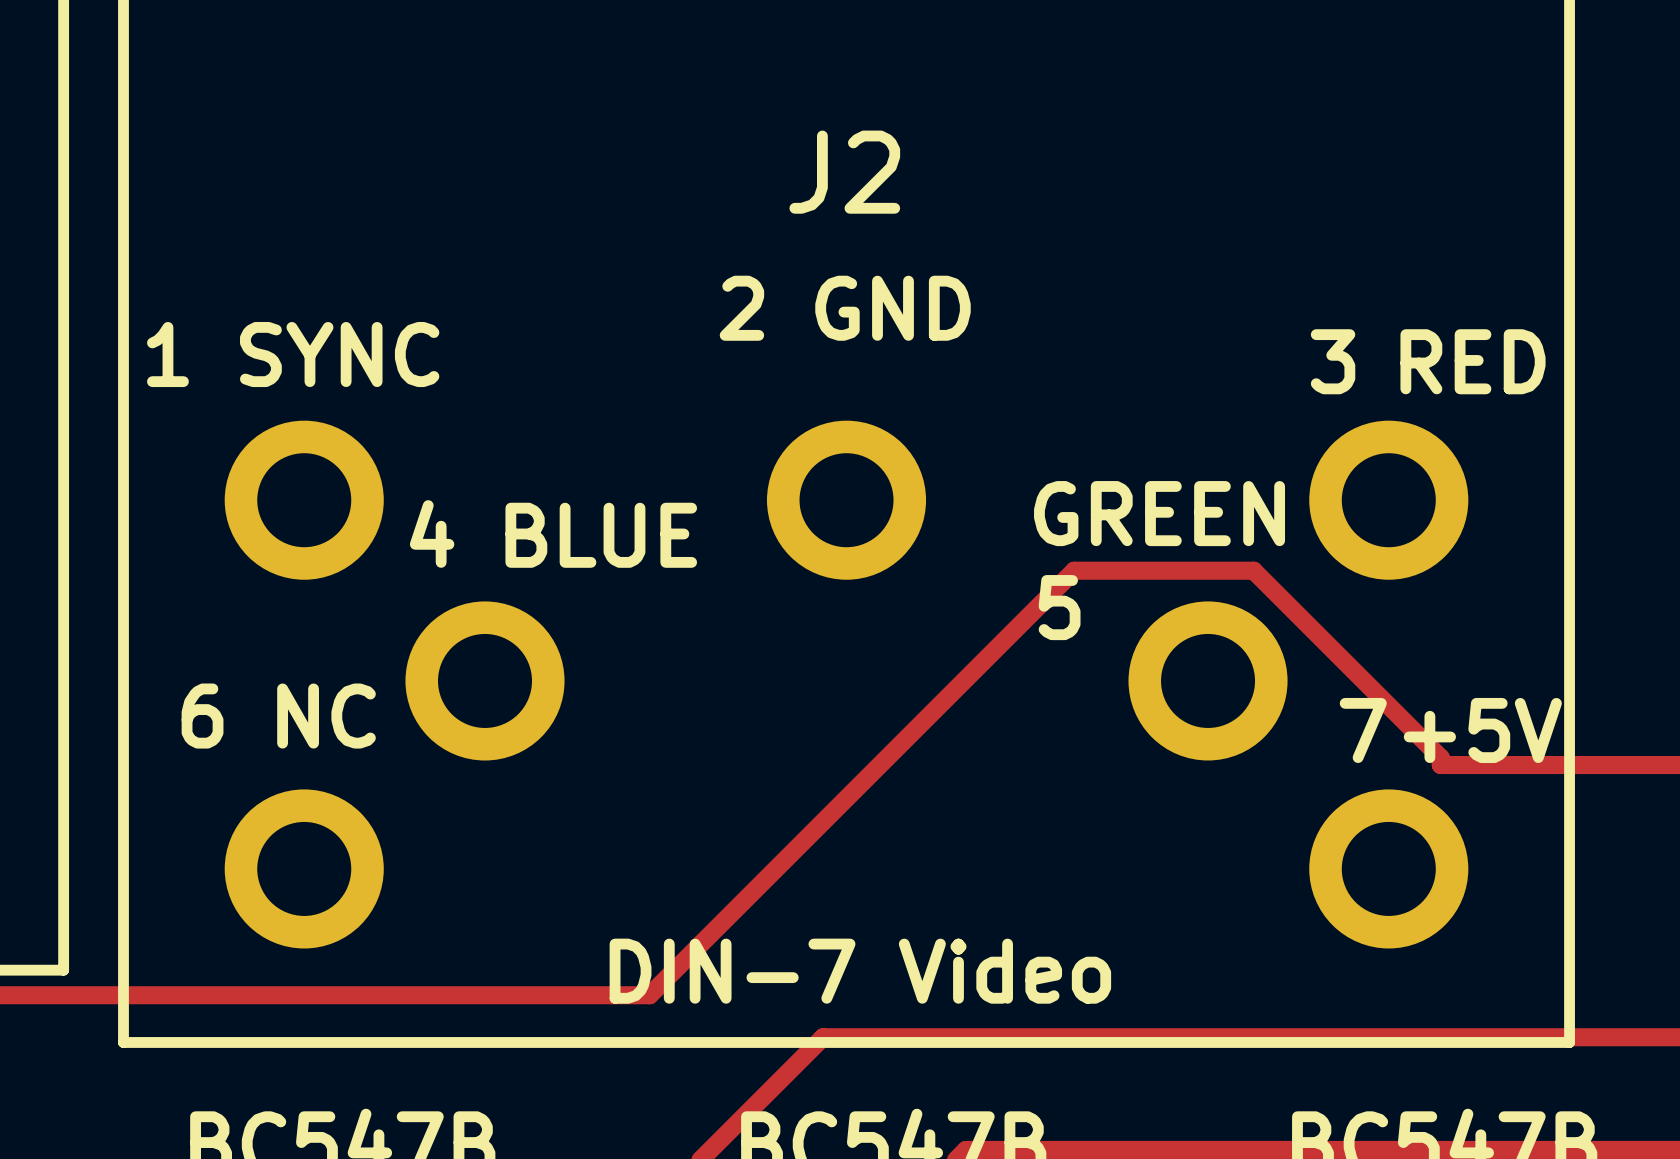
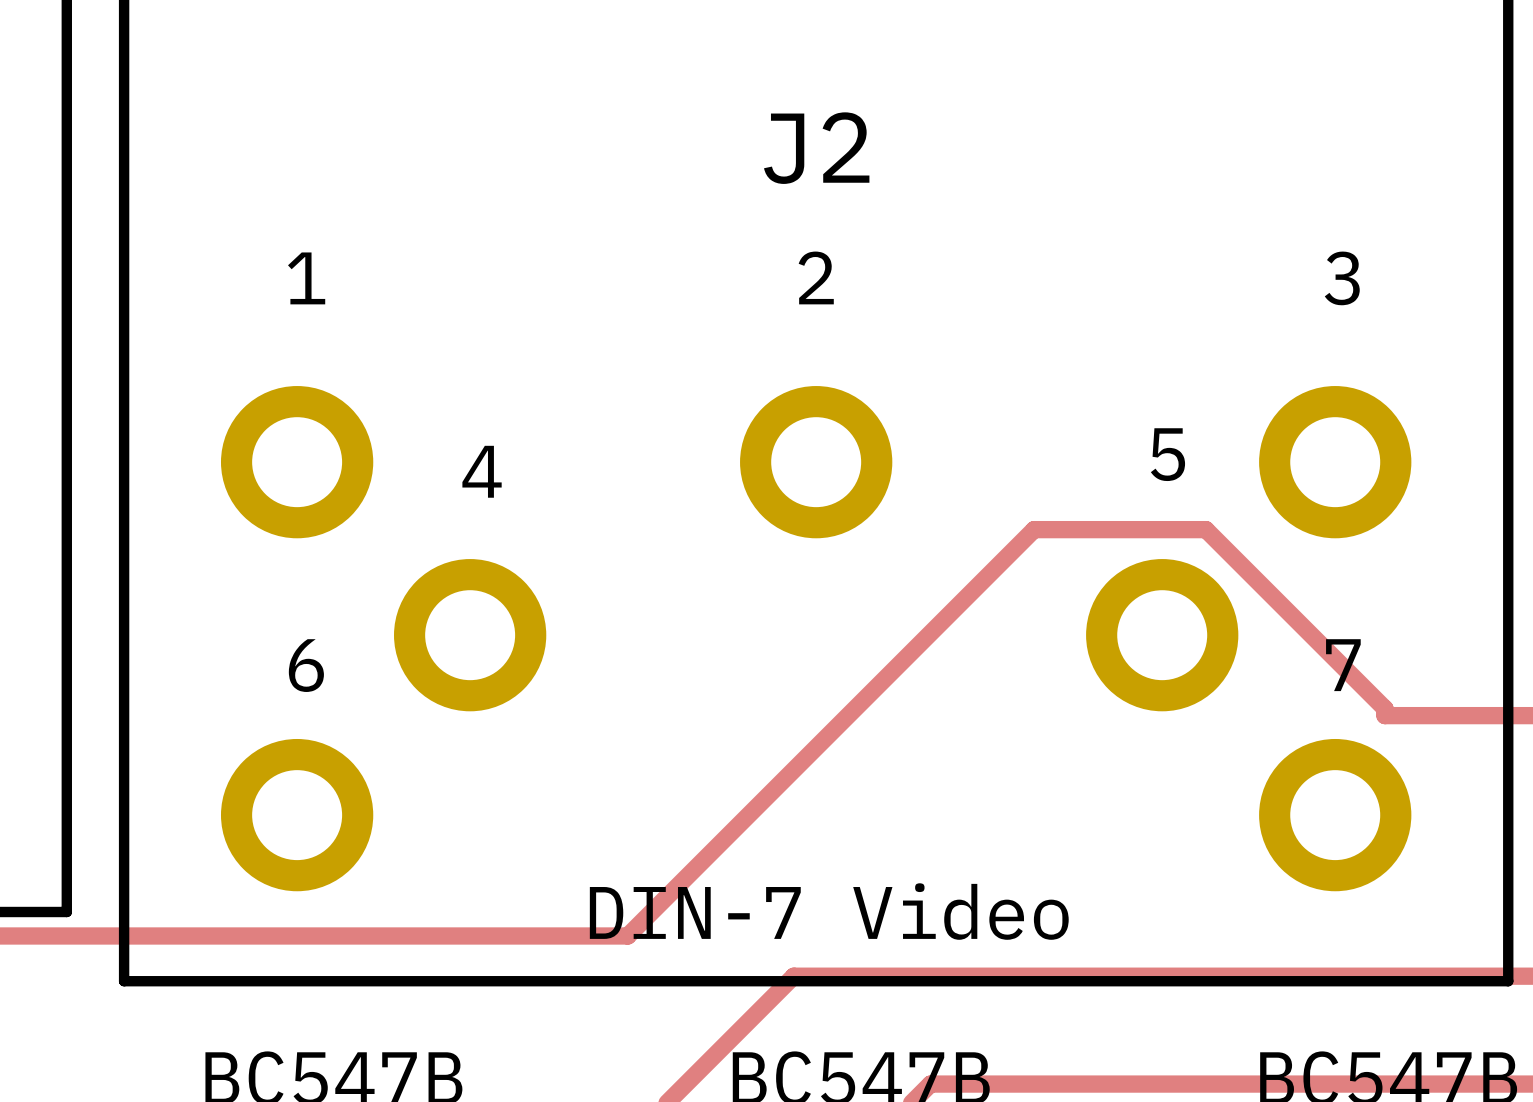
text: 2 GND (845, 308) -> 2 (816, 277)
text: 1 SYNC (293, 354) -> 1 (306, 278)
text position: 3 (1333, 361) -> 3 (1342, 278)
text: RED (1473, 361) -> none
text: GREEN (1159, 513) -> none
text: 4 BLUE (553, 533) -> 4 (482, 471)
text position: 5 (1059, 607) -> 5 (1167, 454)
text: 6 NC (278, 716) -> 6 (306, 665)
text position: 7 (1363, 730) -> 7 (1343, 665)
text: +5V (1482, 730) -> none

